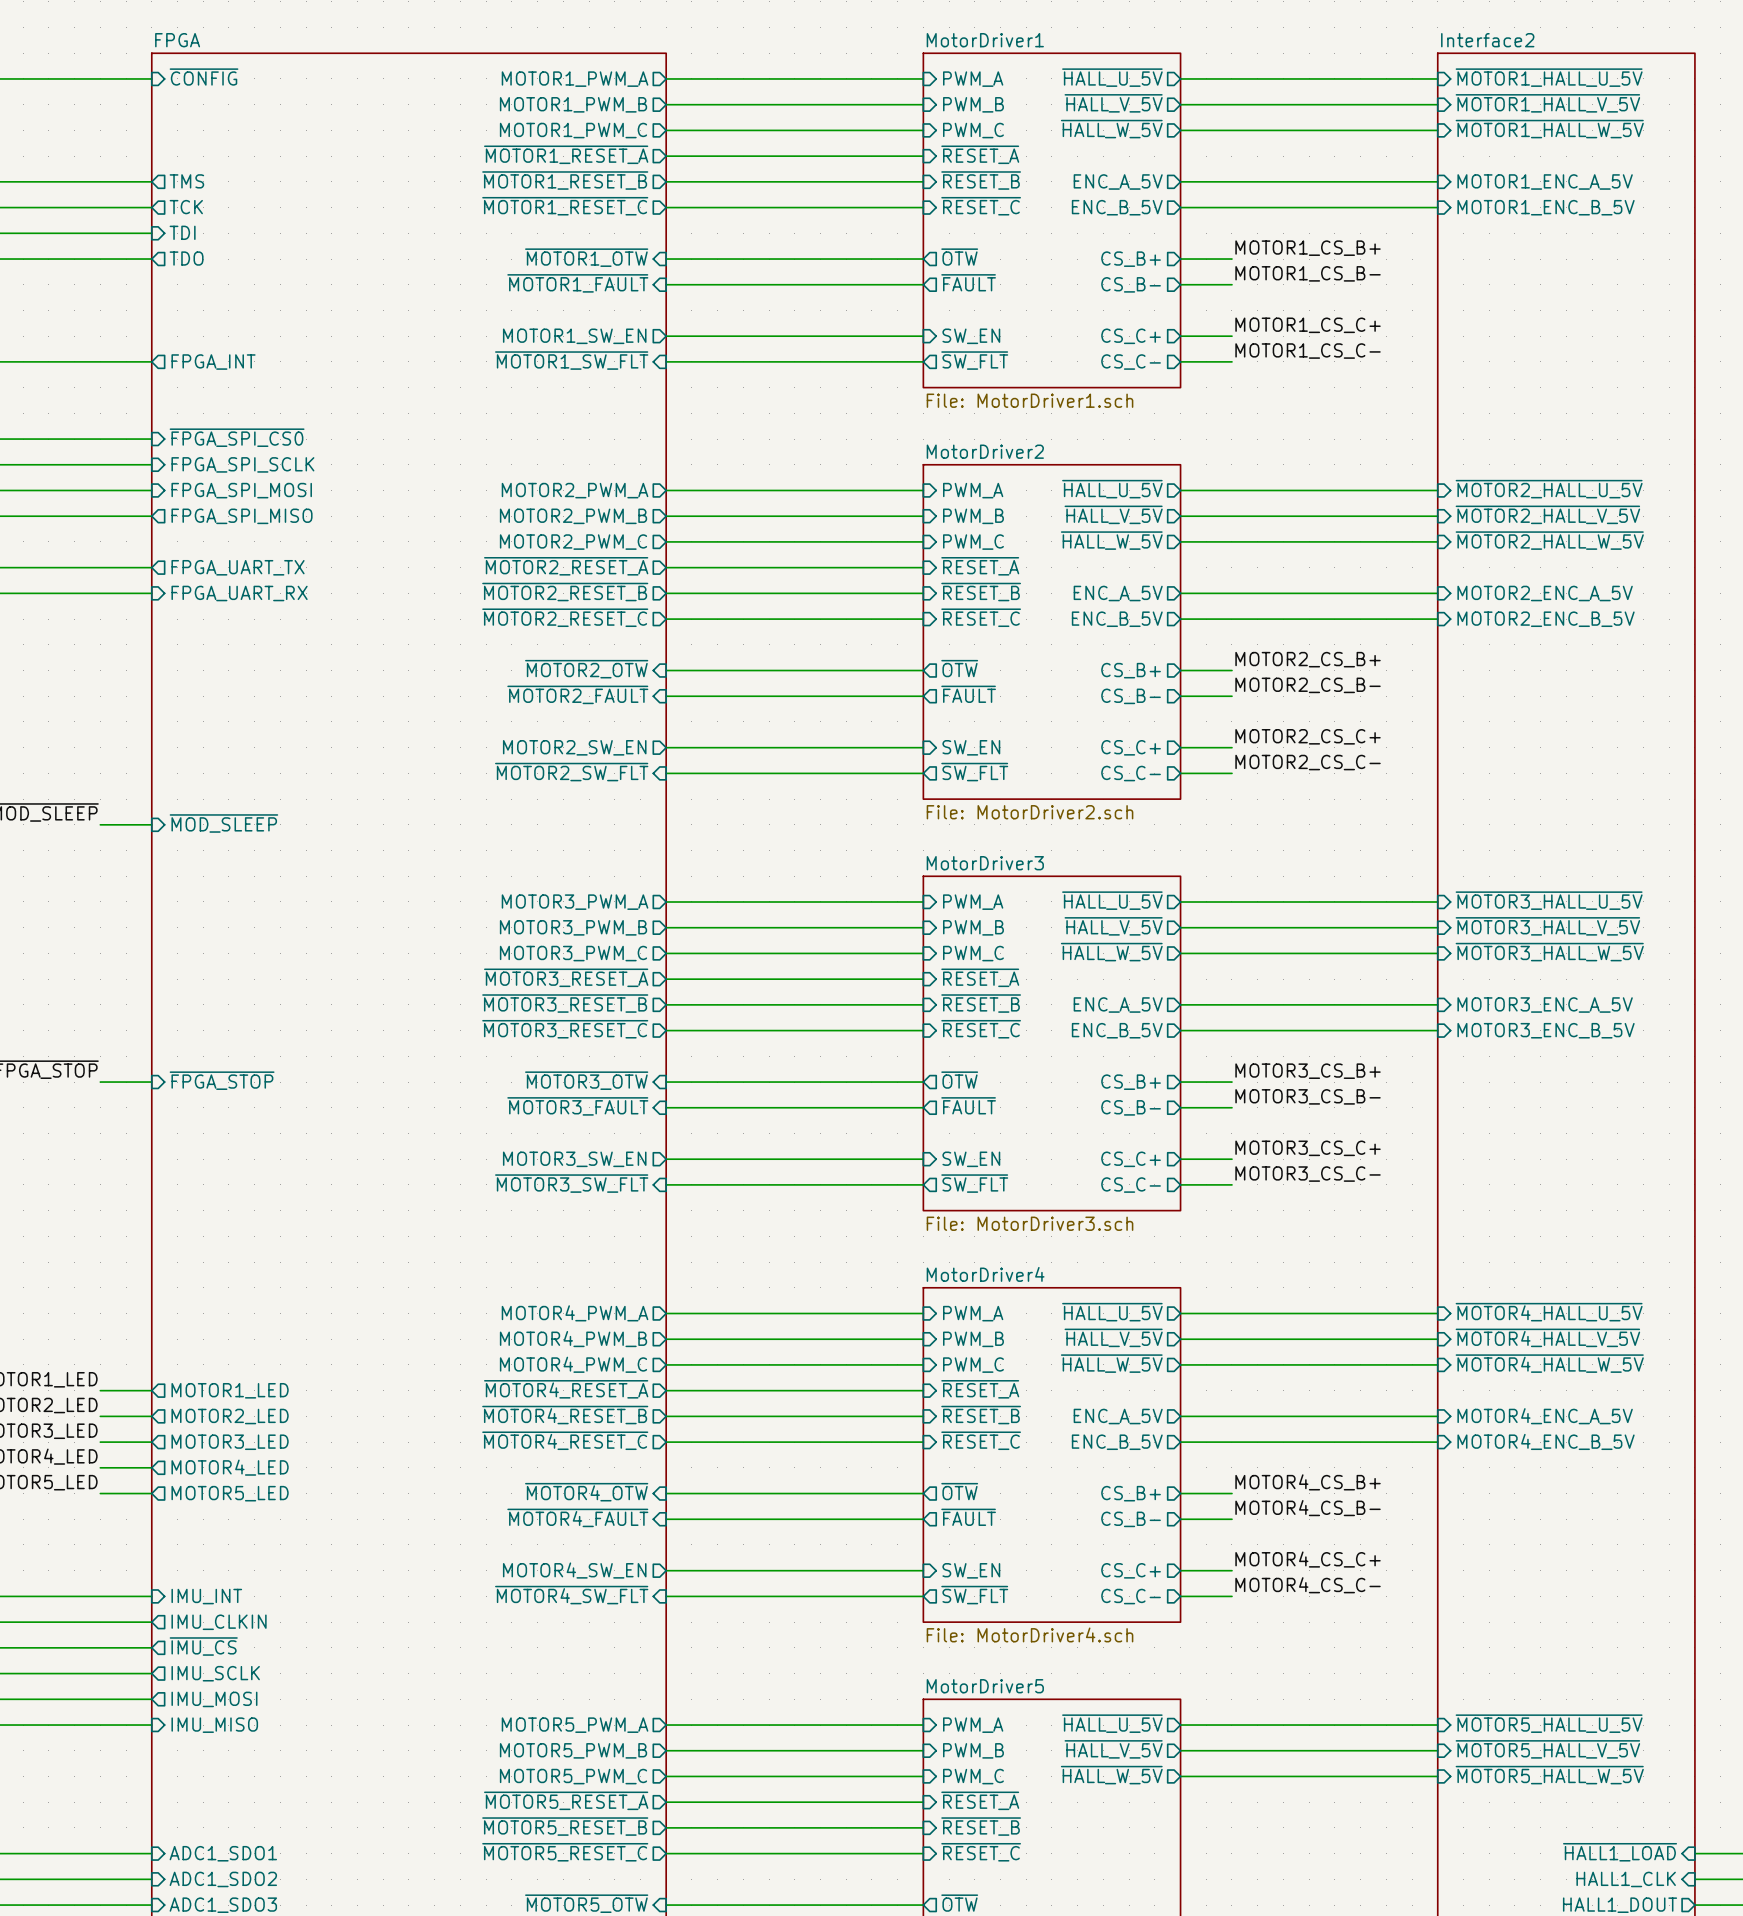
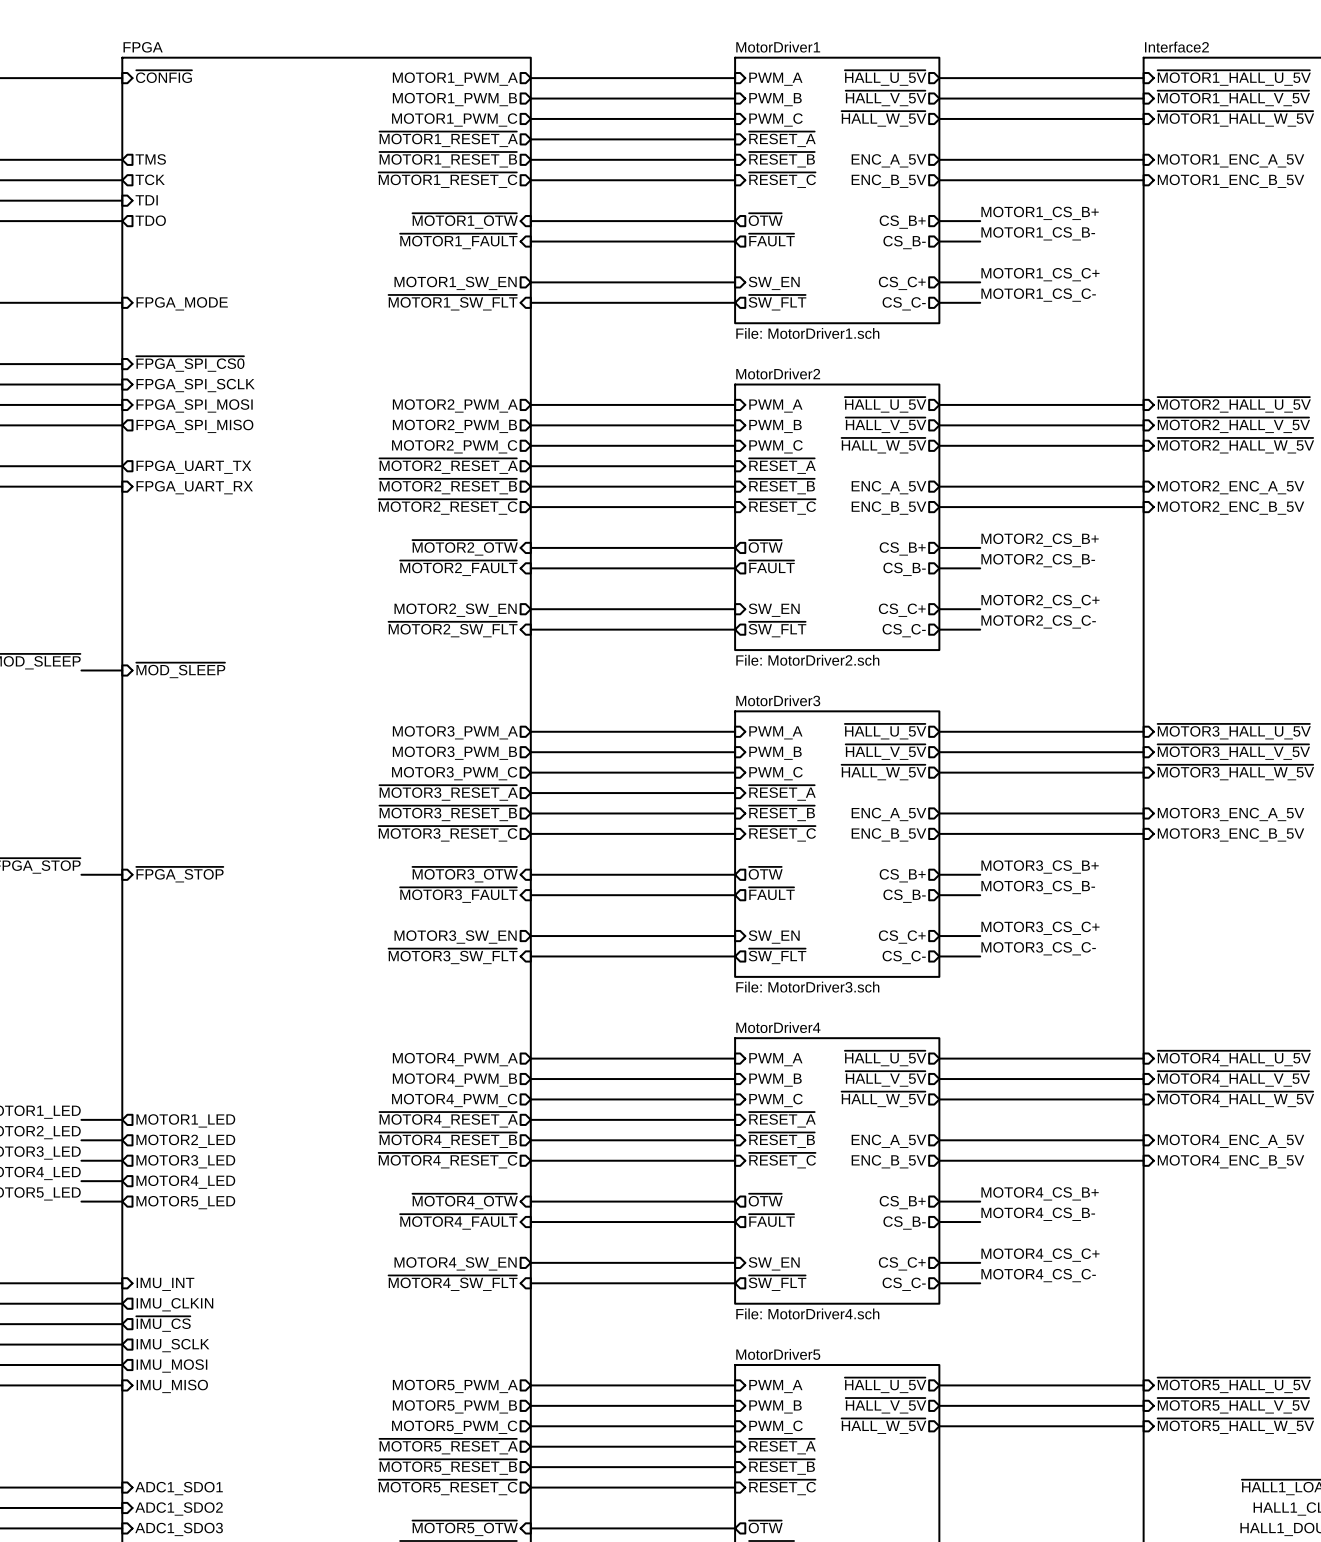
sheet pin shape: output (213, 362) -> input (182, 303)
sheet pin: FPGA_INT (213, 362) -> FPGA_MODE (182, 303)

